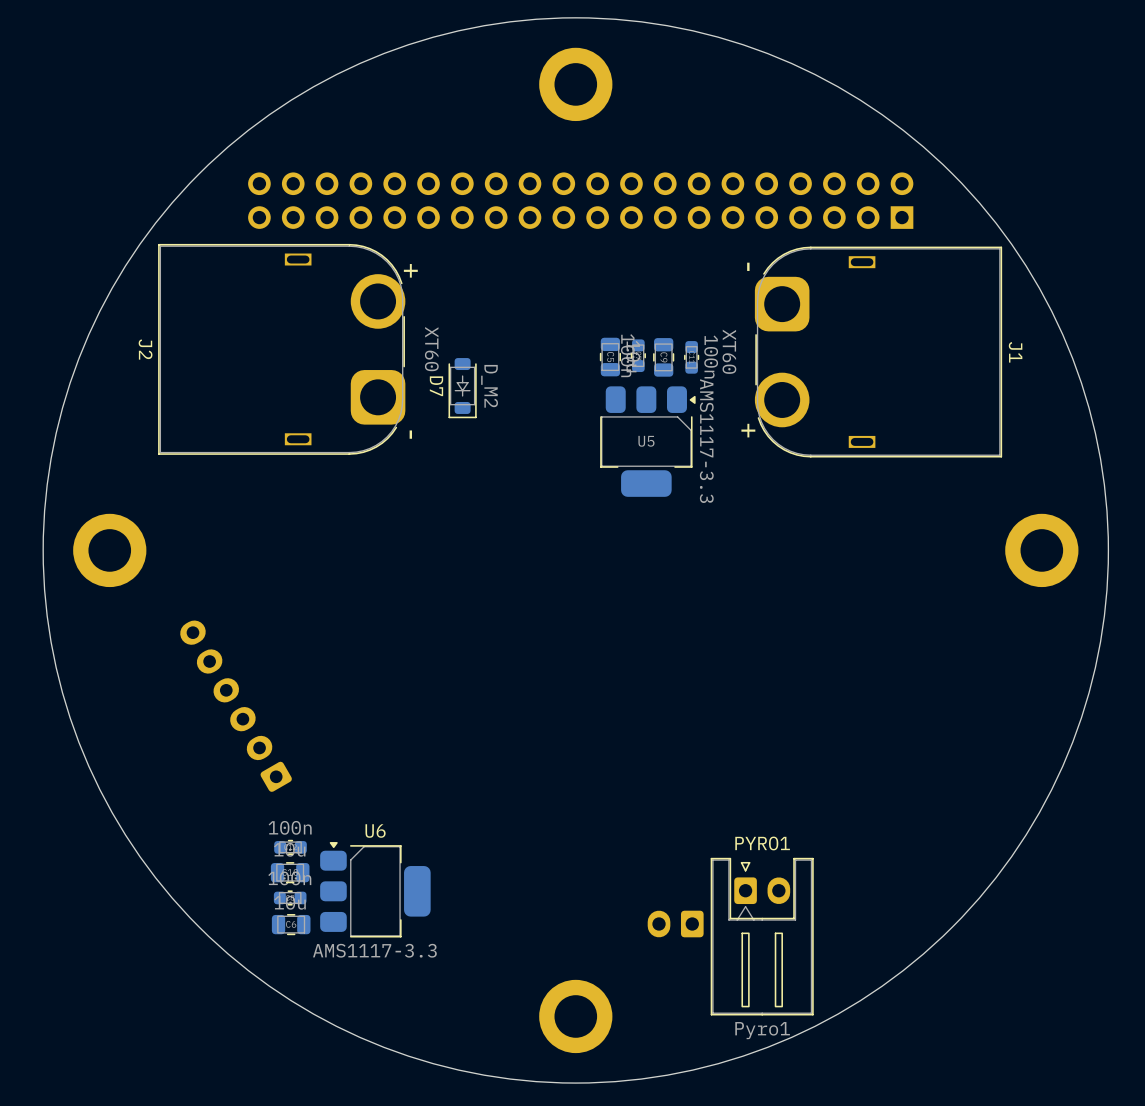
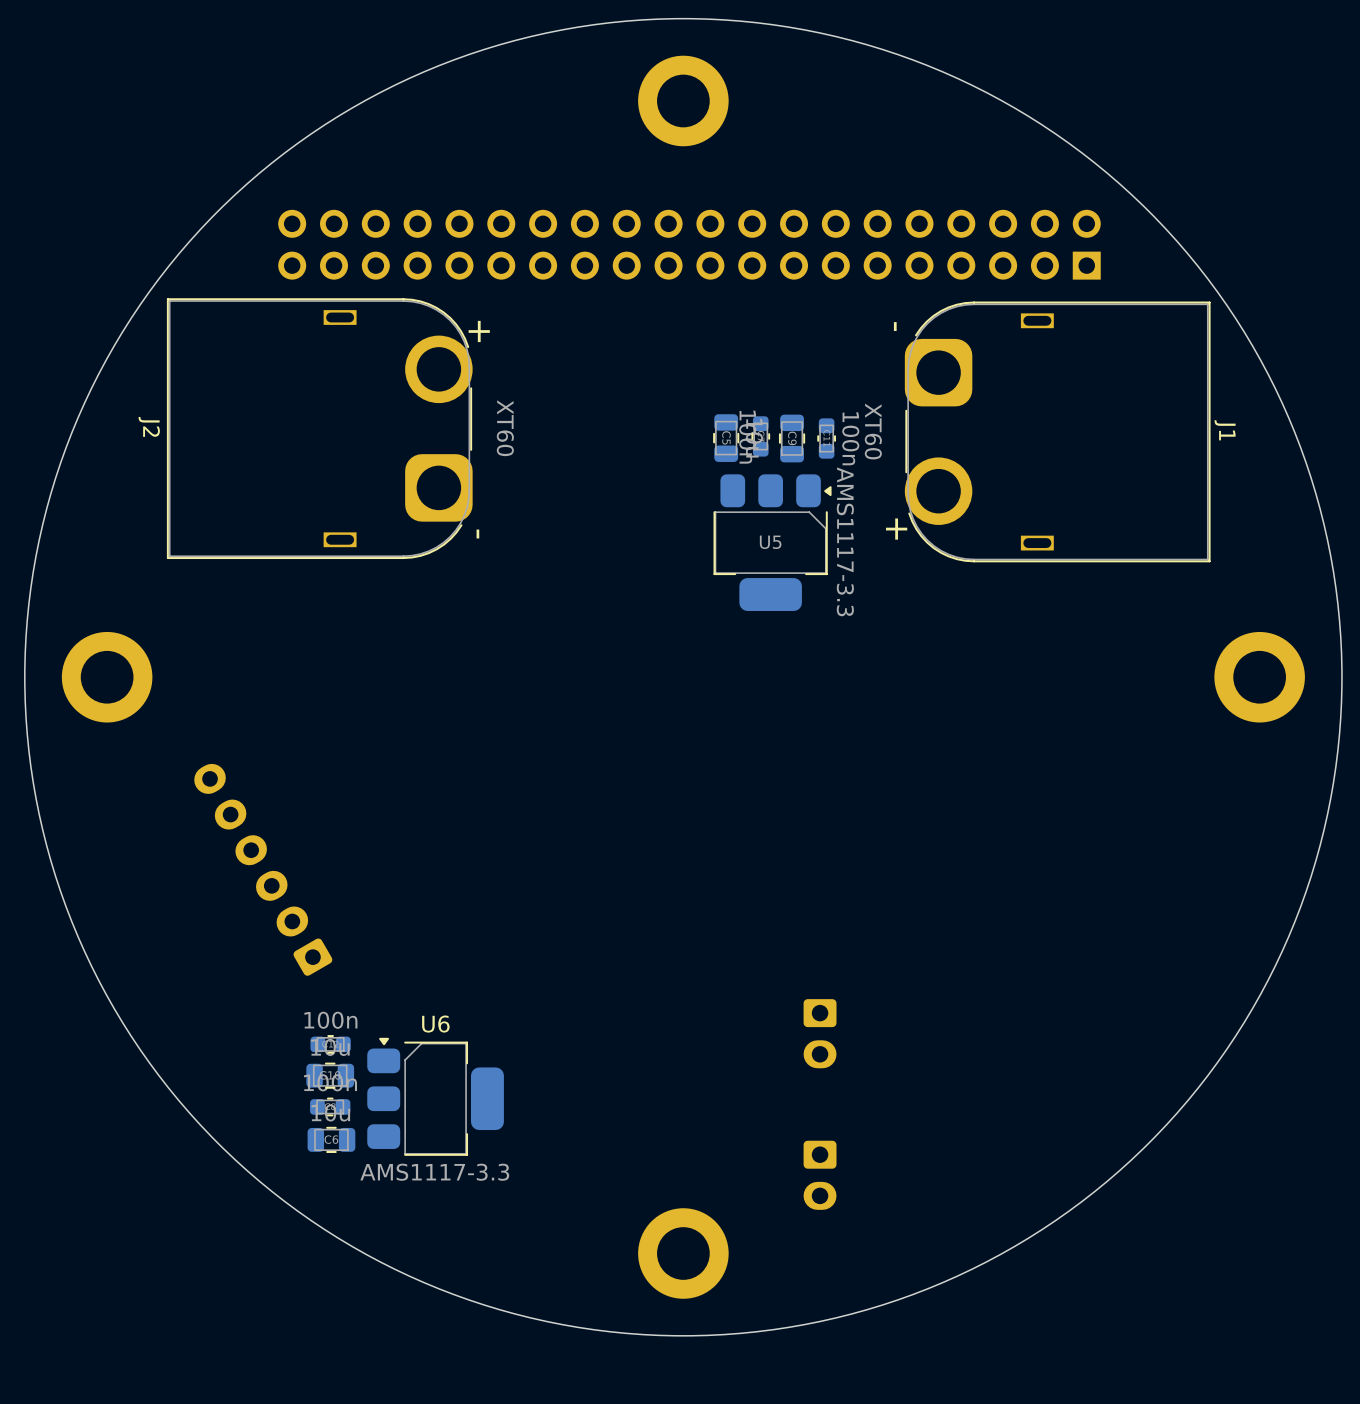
D7: D_M2 (462, 388) -> none
part rotation: 0° (675, 924) -> 90° counterclockwise (820, 1033)
part position: (675, 924) -> (820, 1033)
PYRO1 side: bottom (762, 936) -> top (820, 1175)

